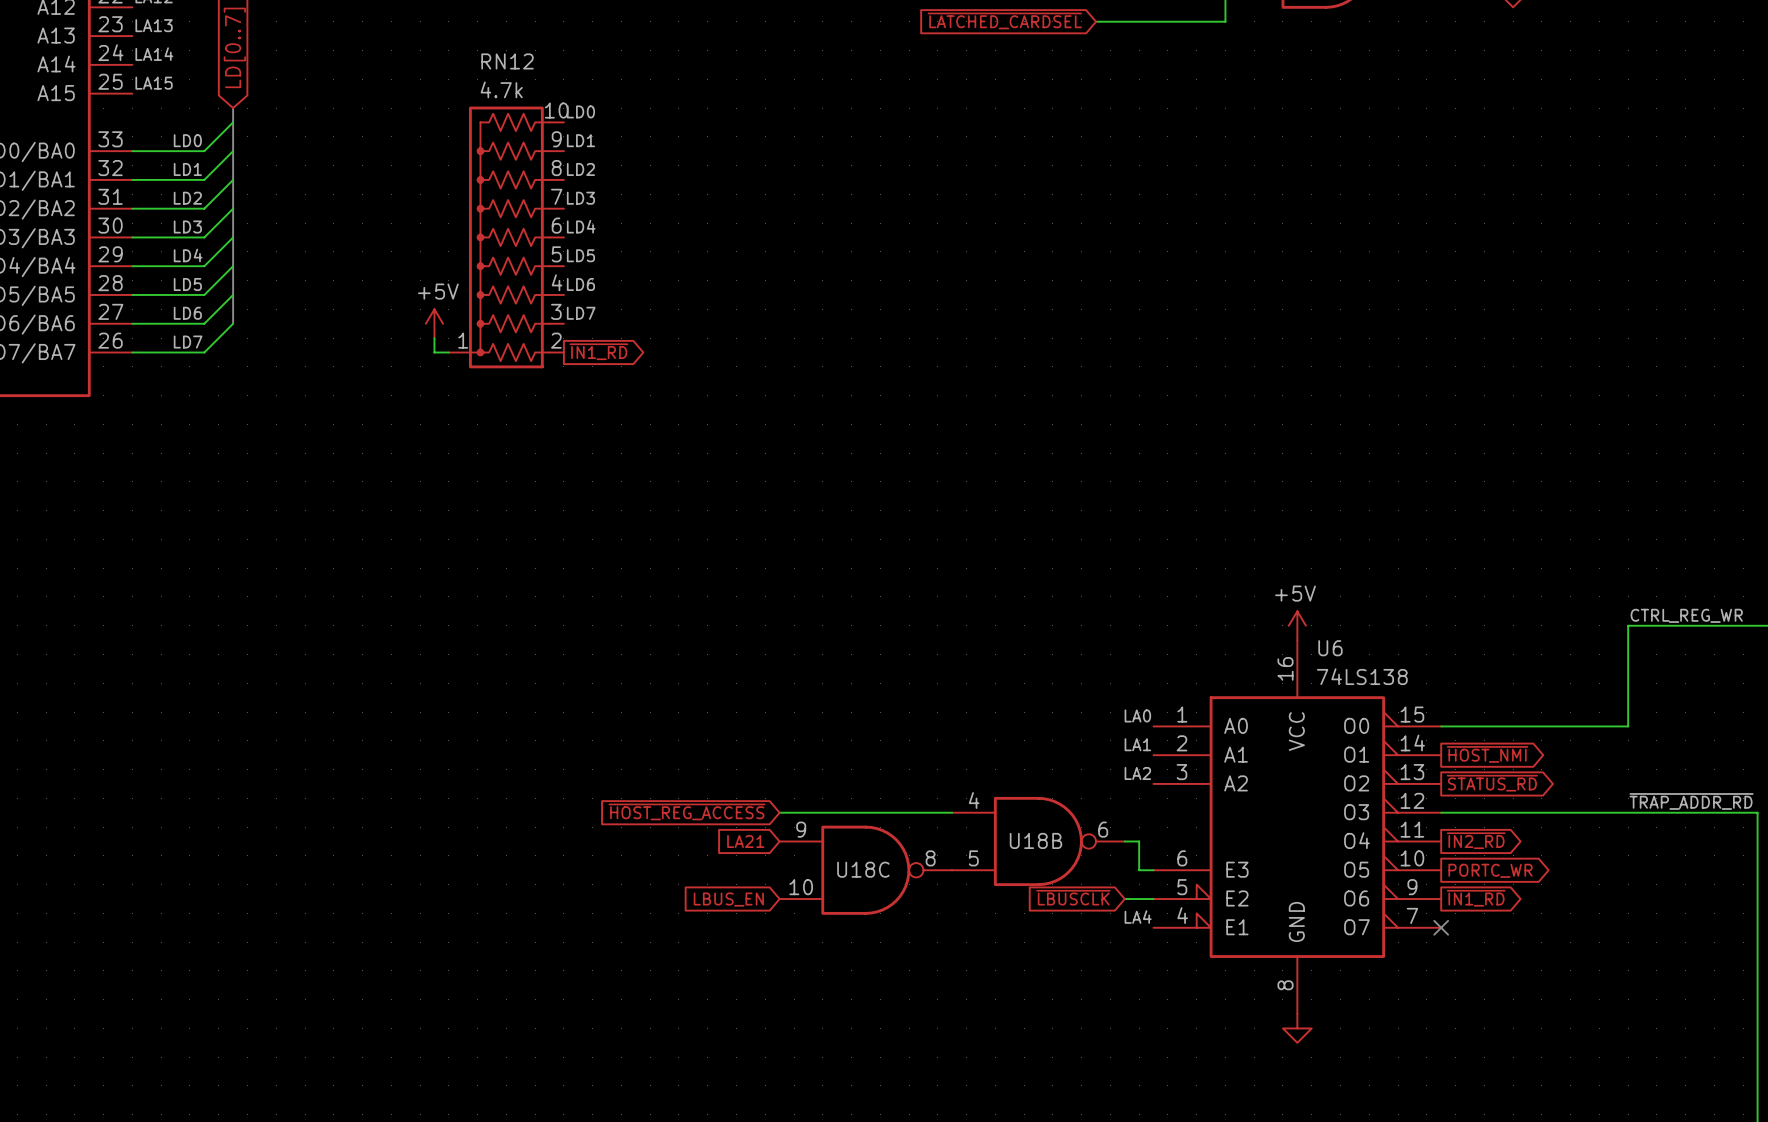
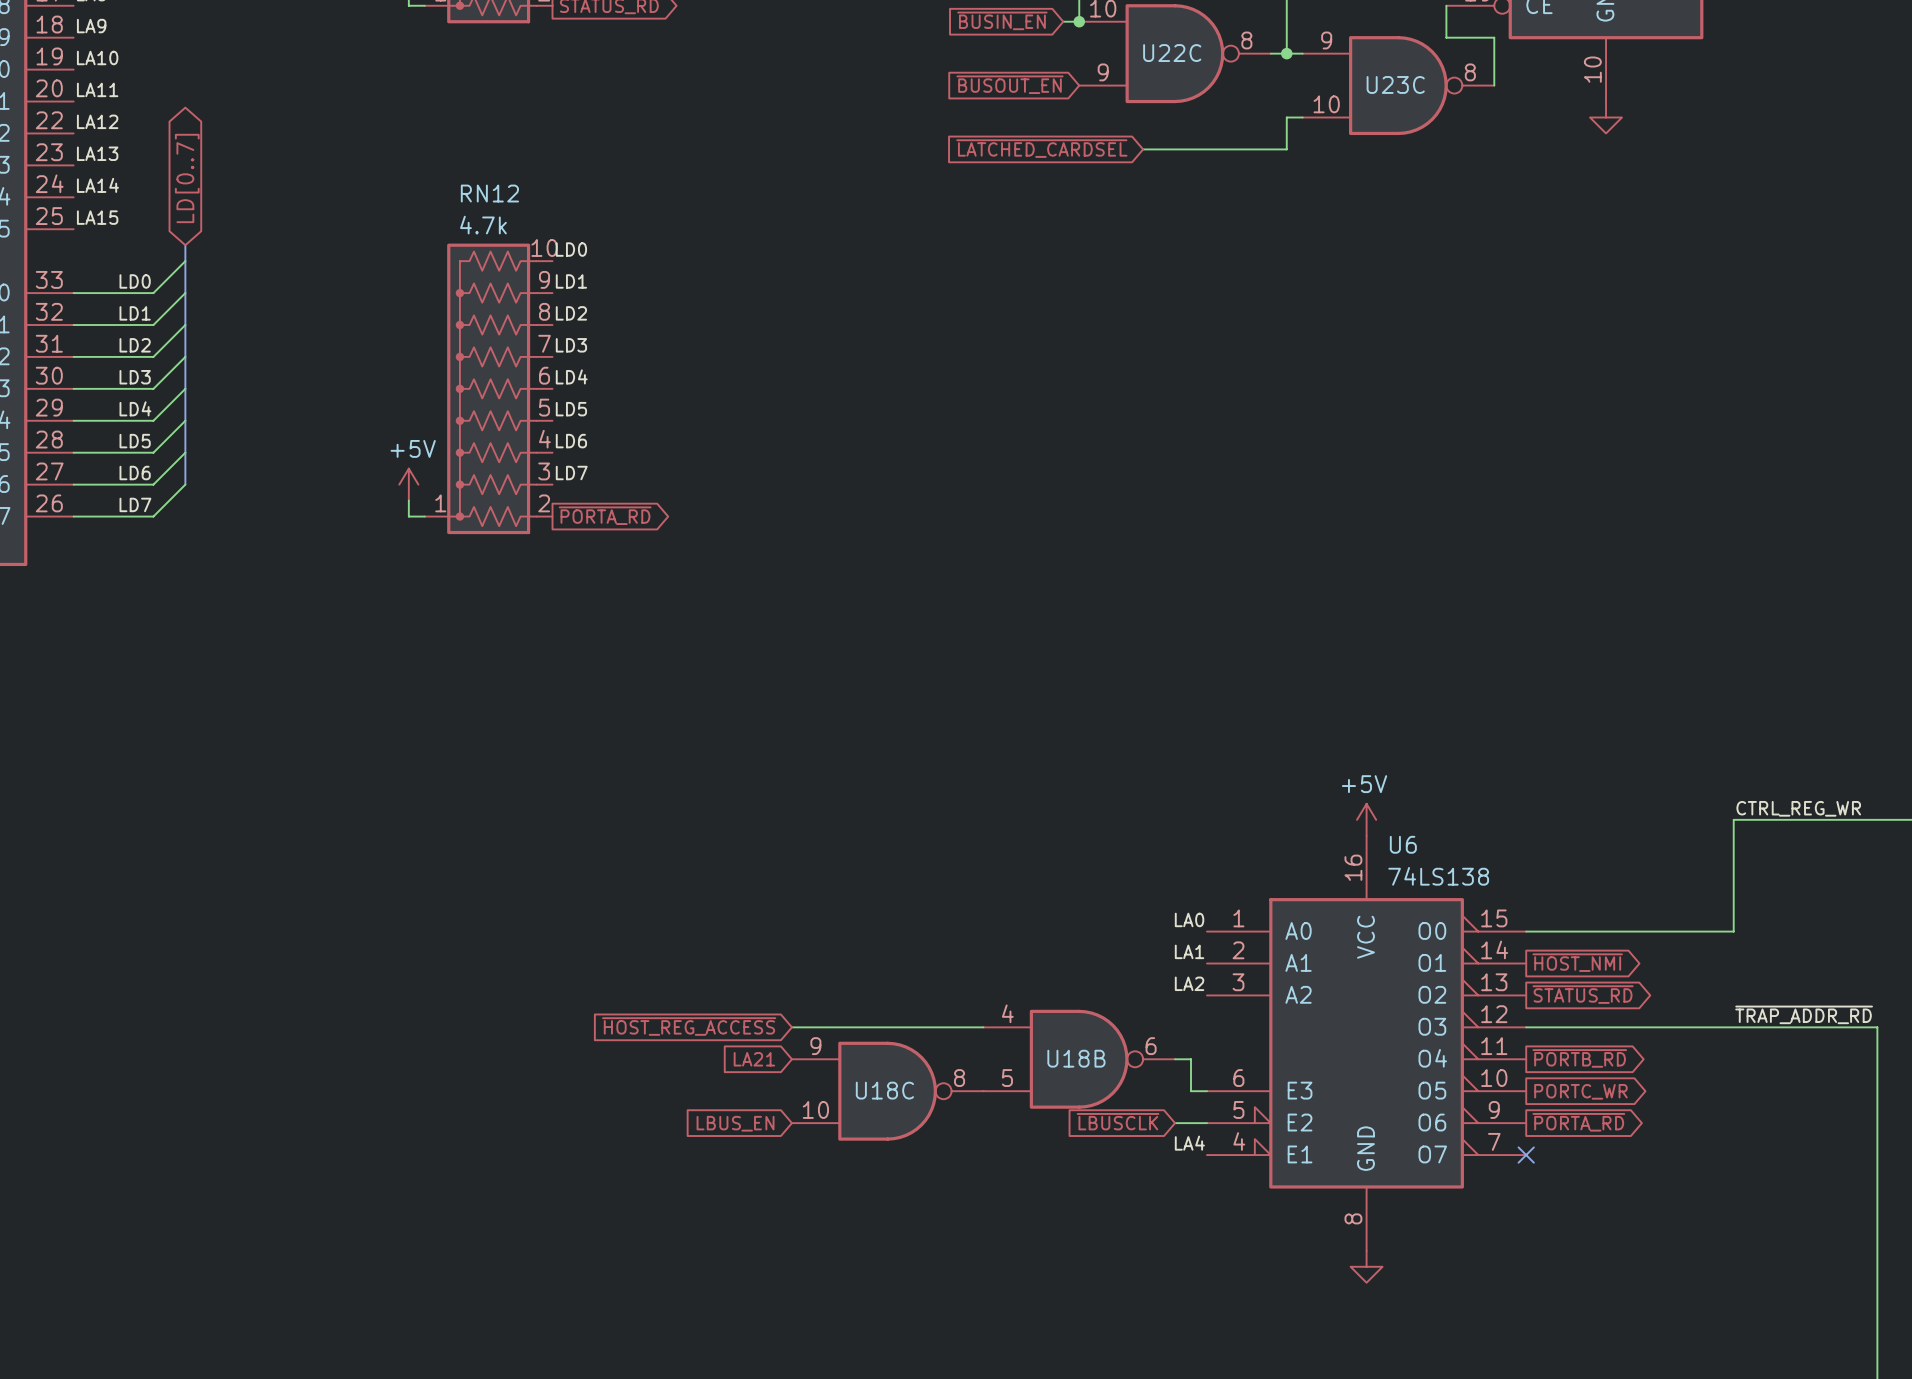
global label: ~{IN1_RD} (598, 351) -> ~{PORTA_RD} (605, 515)
global label: ~{IN2_RD} (1476, 840) -> ~{PORTB_RD} (1579, 1058)
global label: ~{IN1_RD} (1476, 898) -> ~{PORTA_RD} (1578, 1122)

